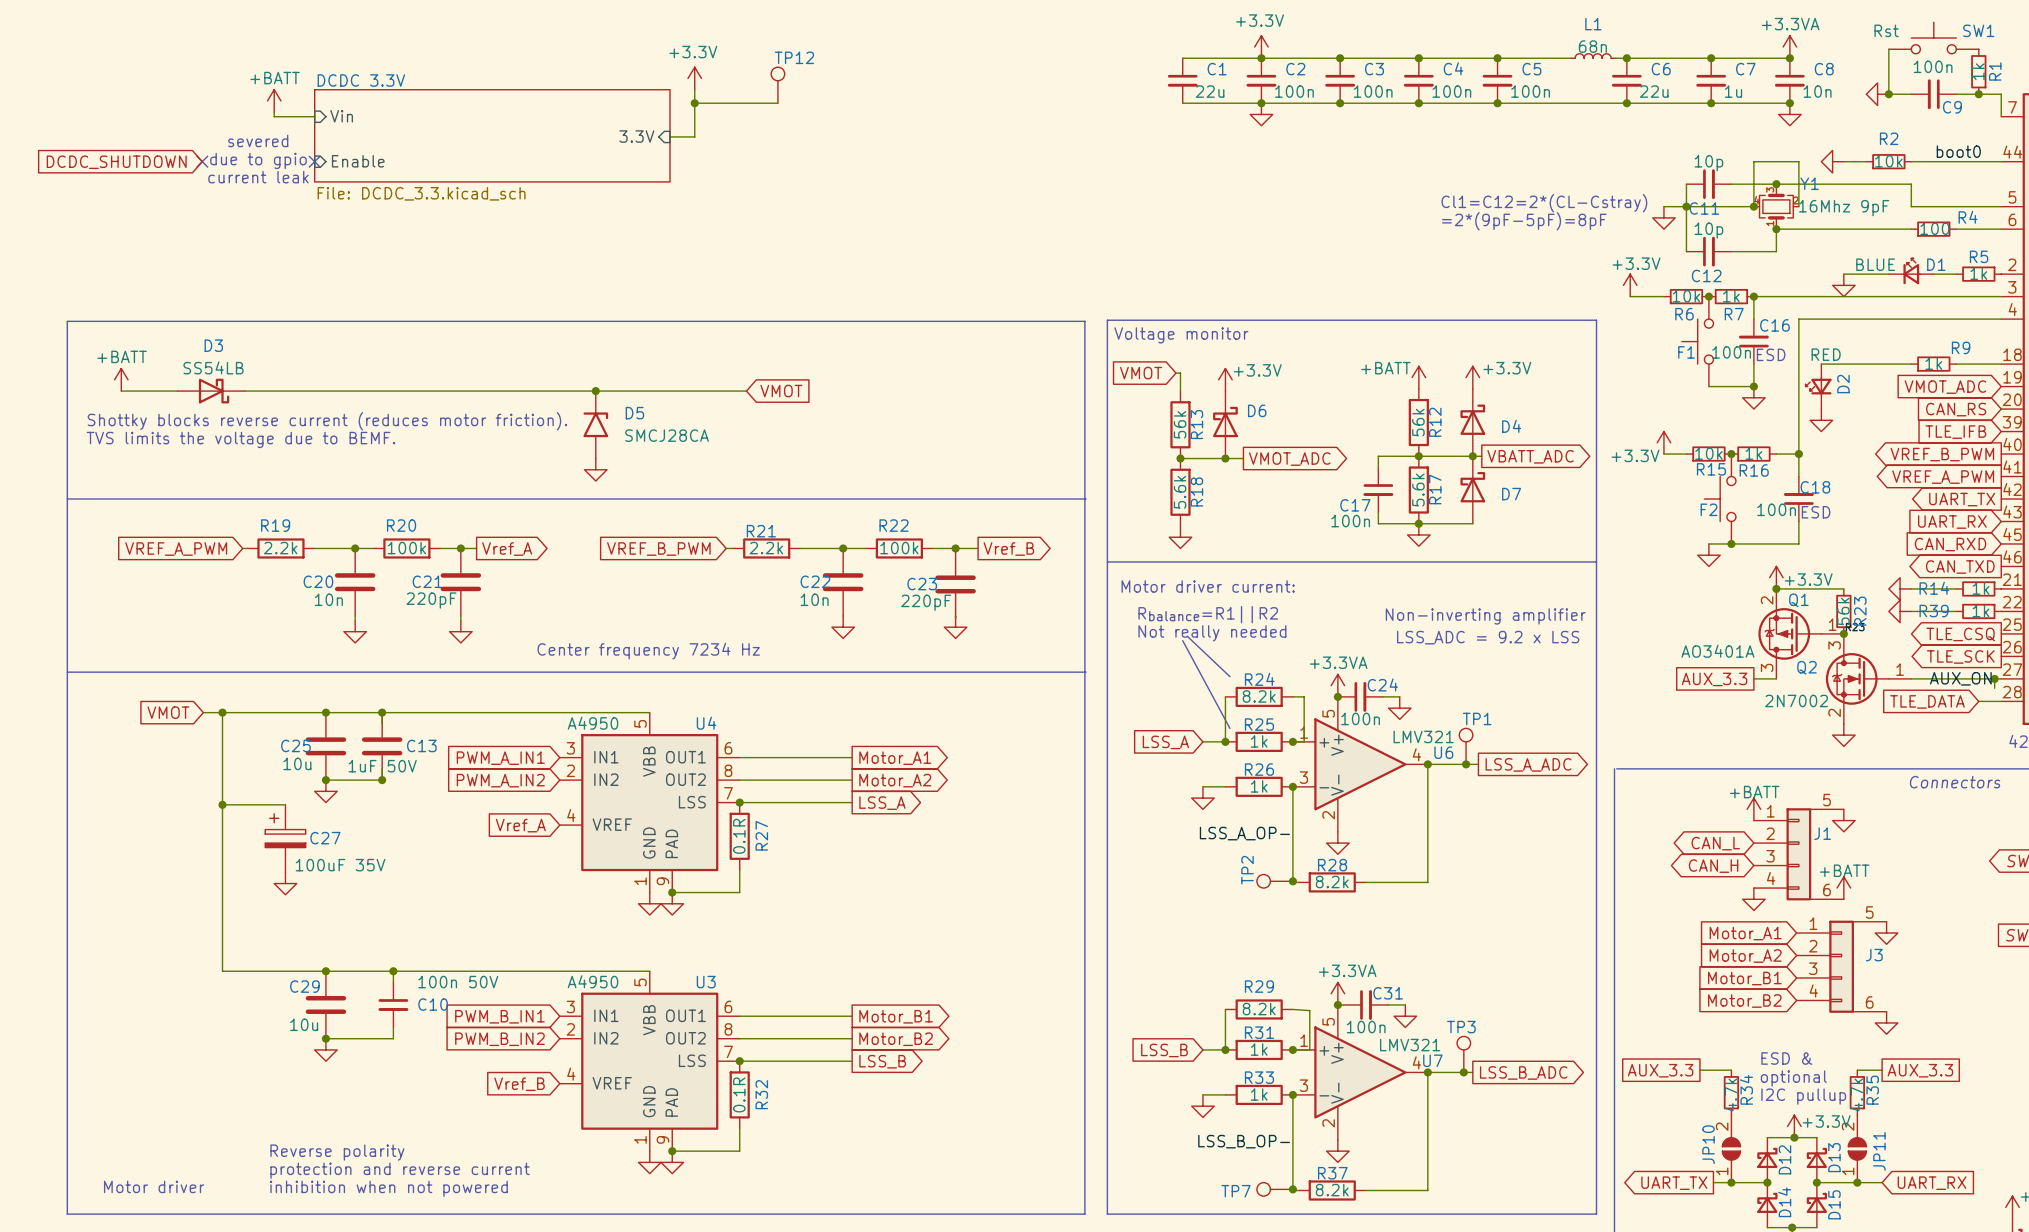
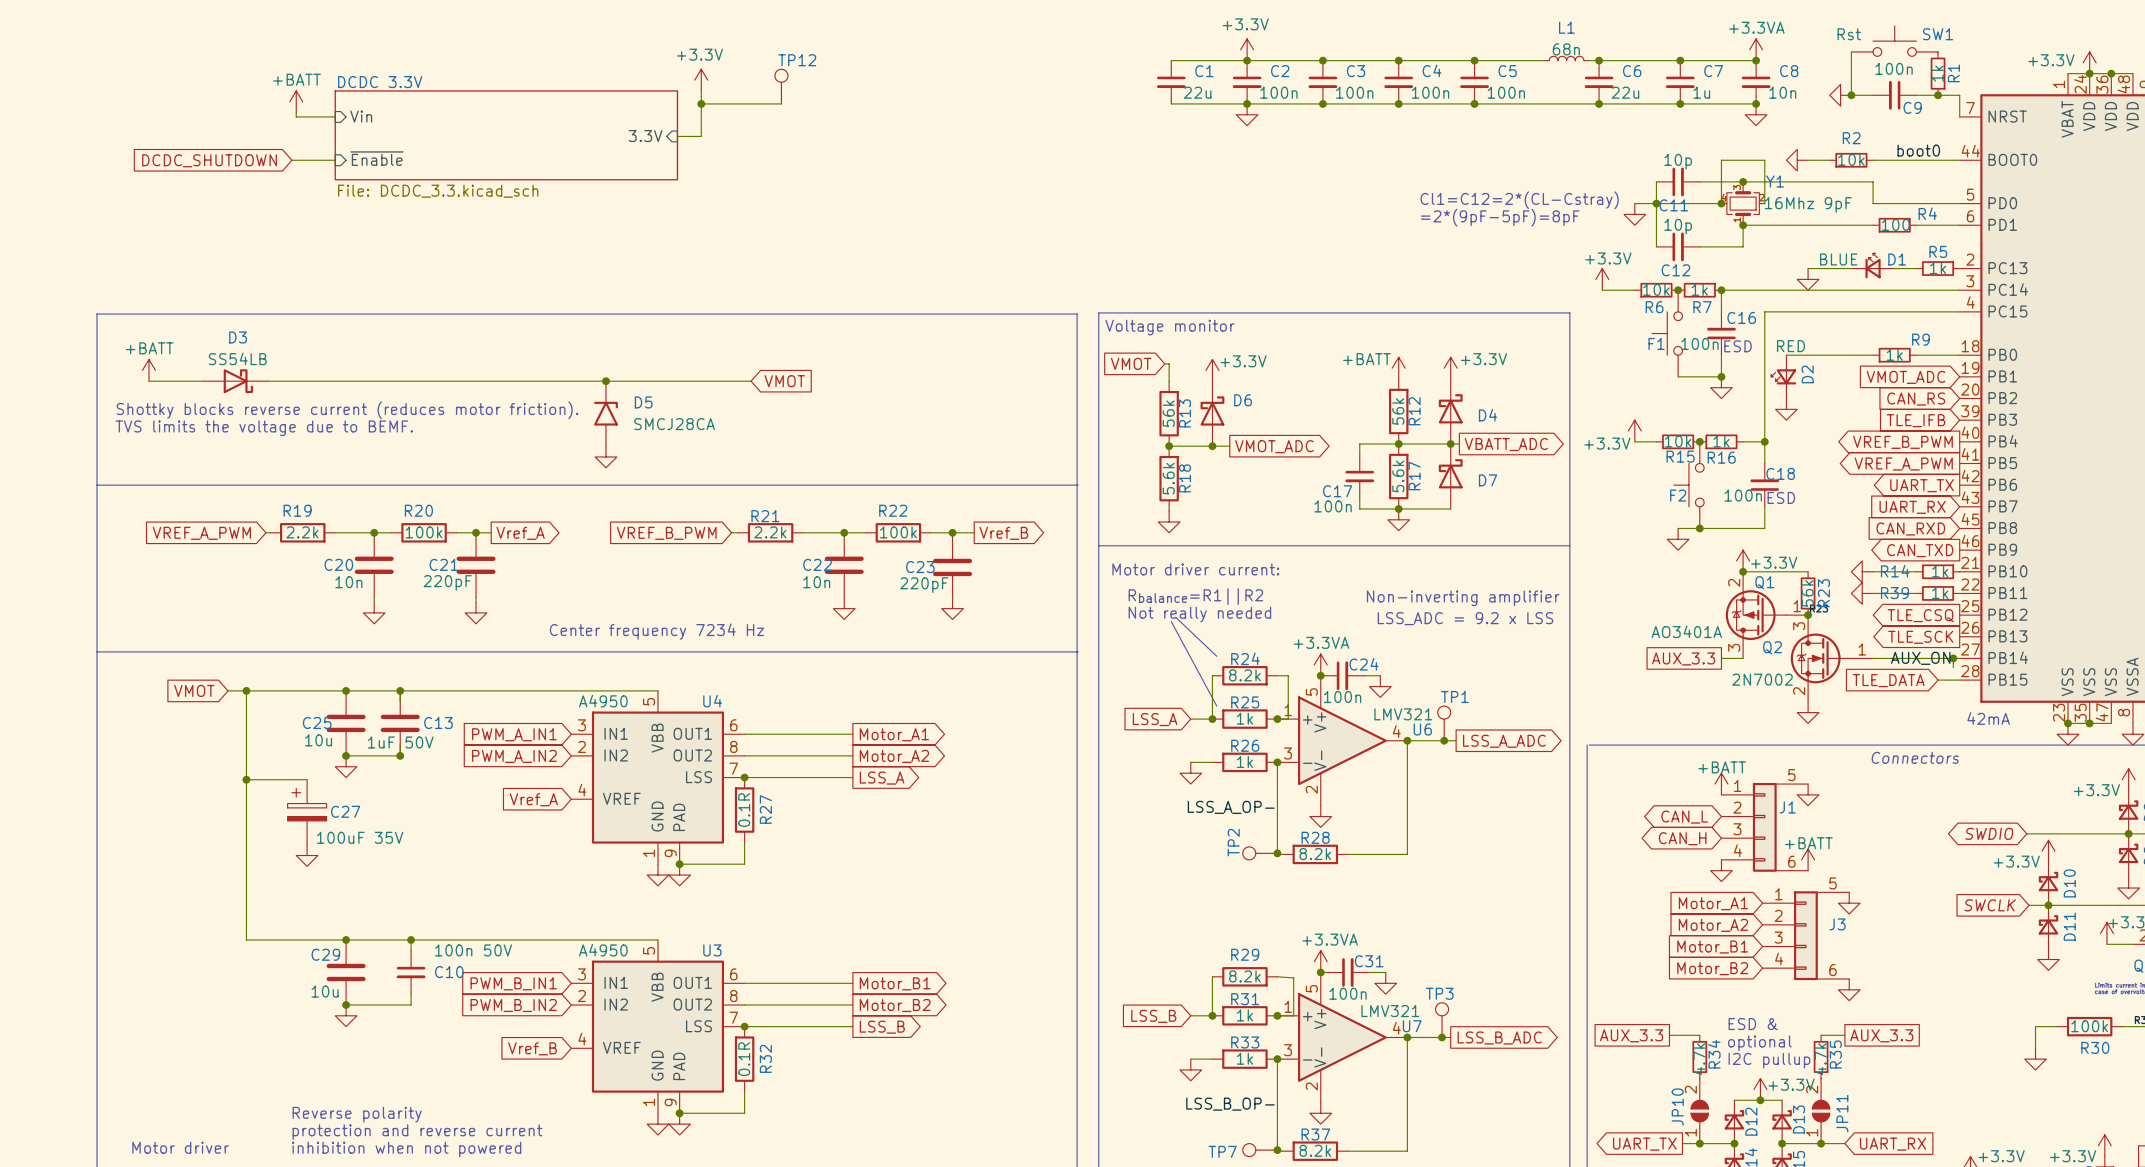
text: severed (258, 140) -> none
text: due to gpio (258, 160) -> none
no-connect mark: (202, 161) -> none
wire: none -> (291, 160) (335, 160)
no-connect mark: (314, 161) -> none
sheet pin: Enable (358, 161) -> ~{Enable} (376, 158)
global label position: DCDC_SHUTDOWN (116, 162) -> DCDC_SHUTDOWN (209, 160)
text: current leak (258, 177) -> none

